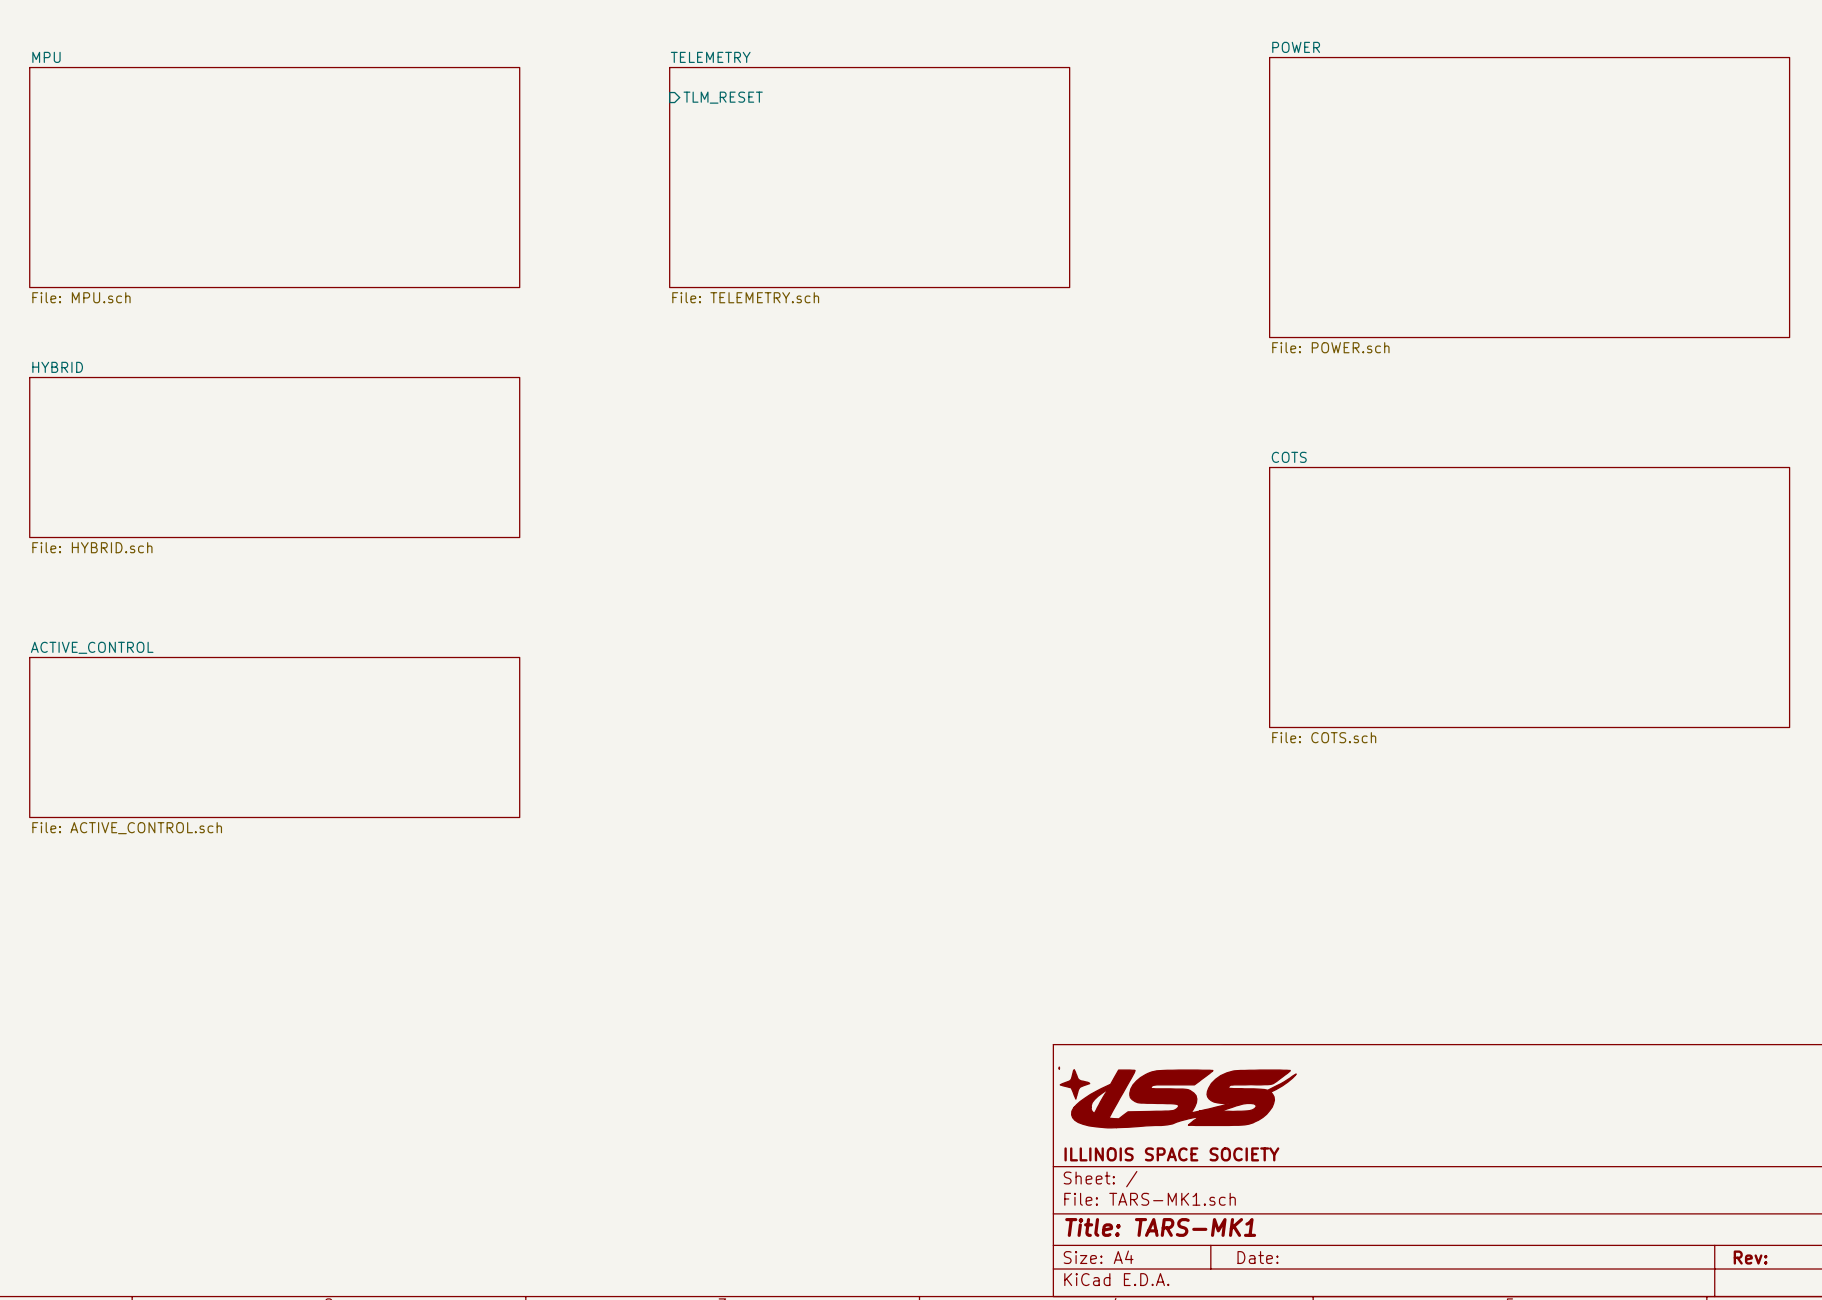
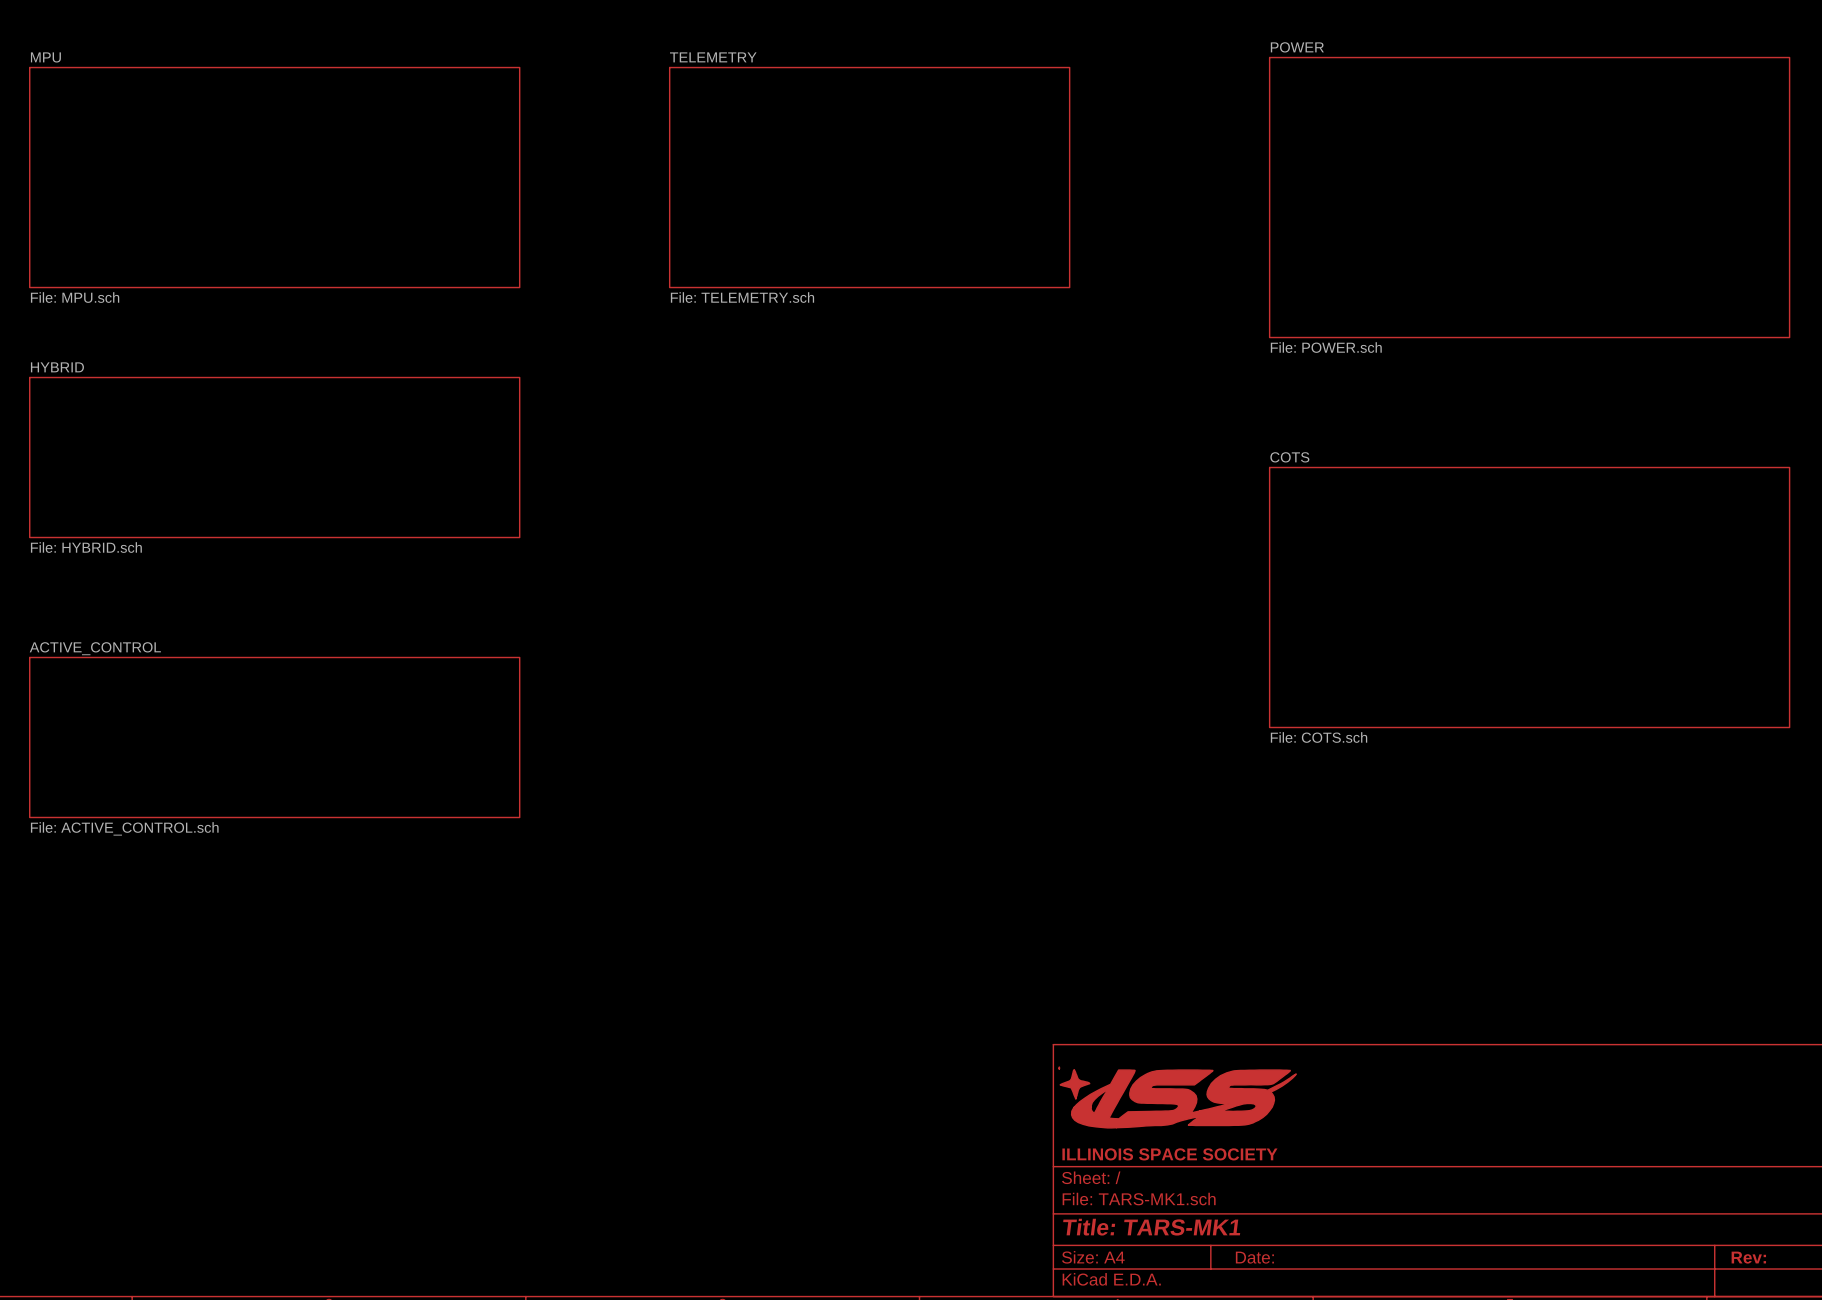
sheet pin: TLM_RESET (723, 97) -> none

